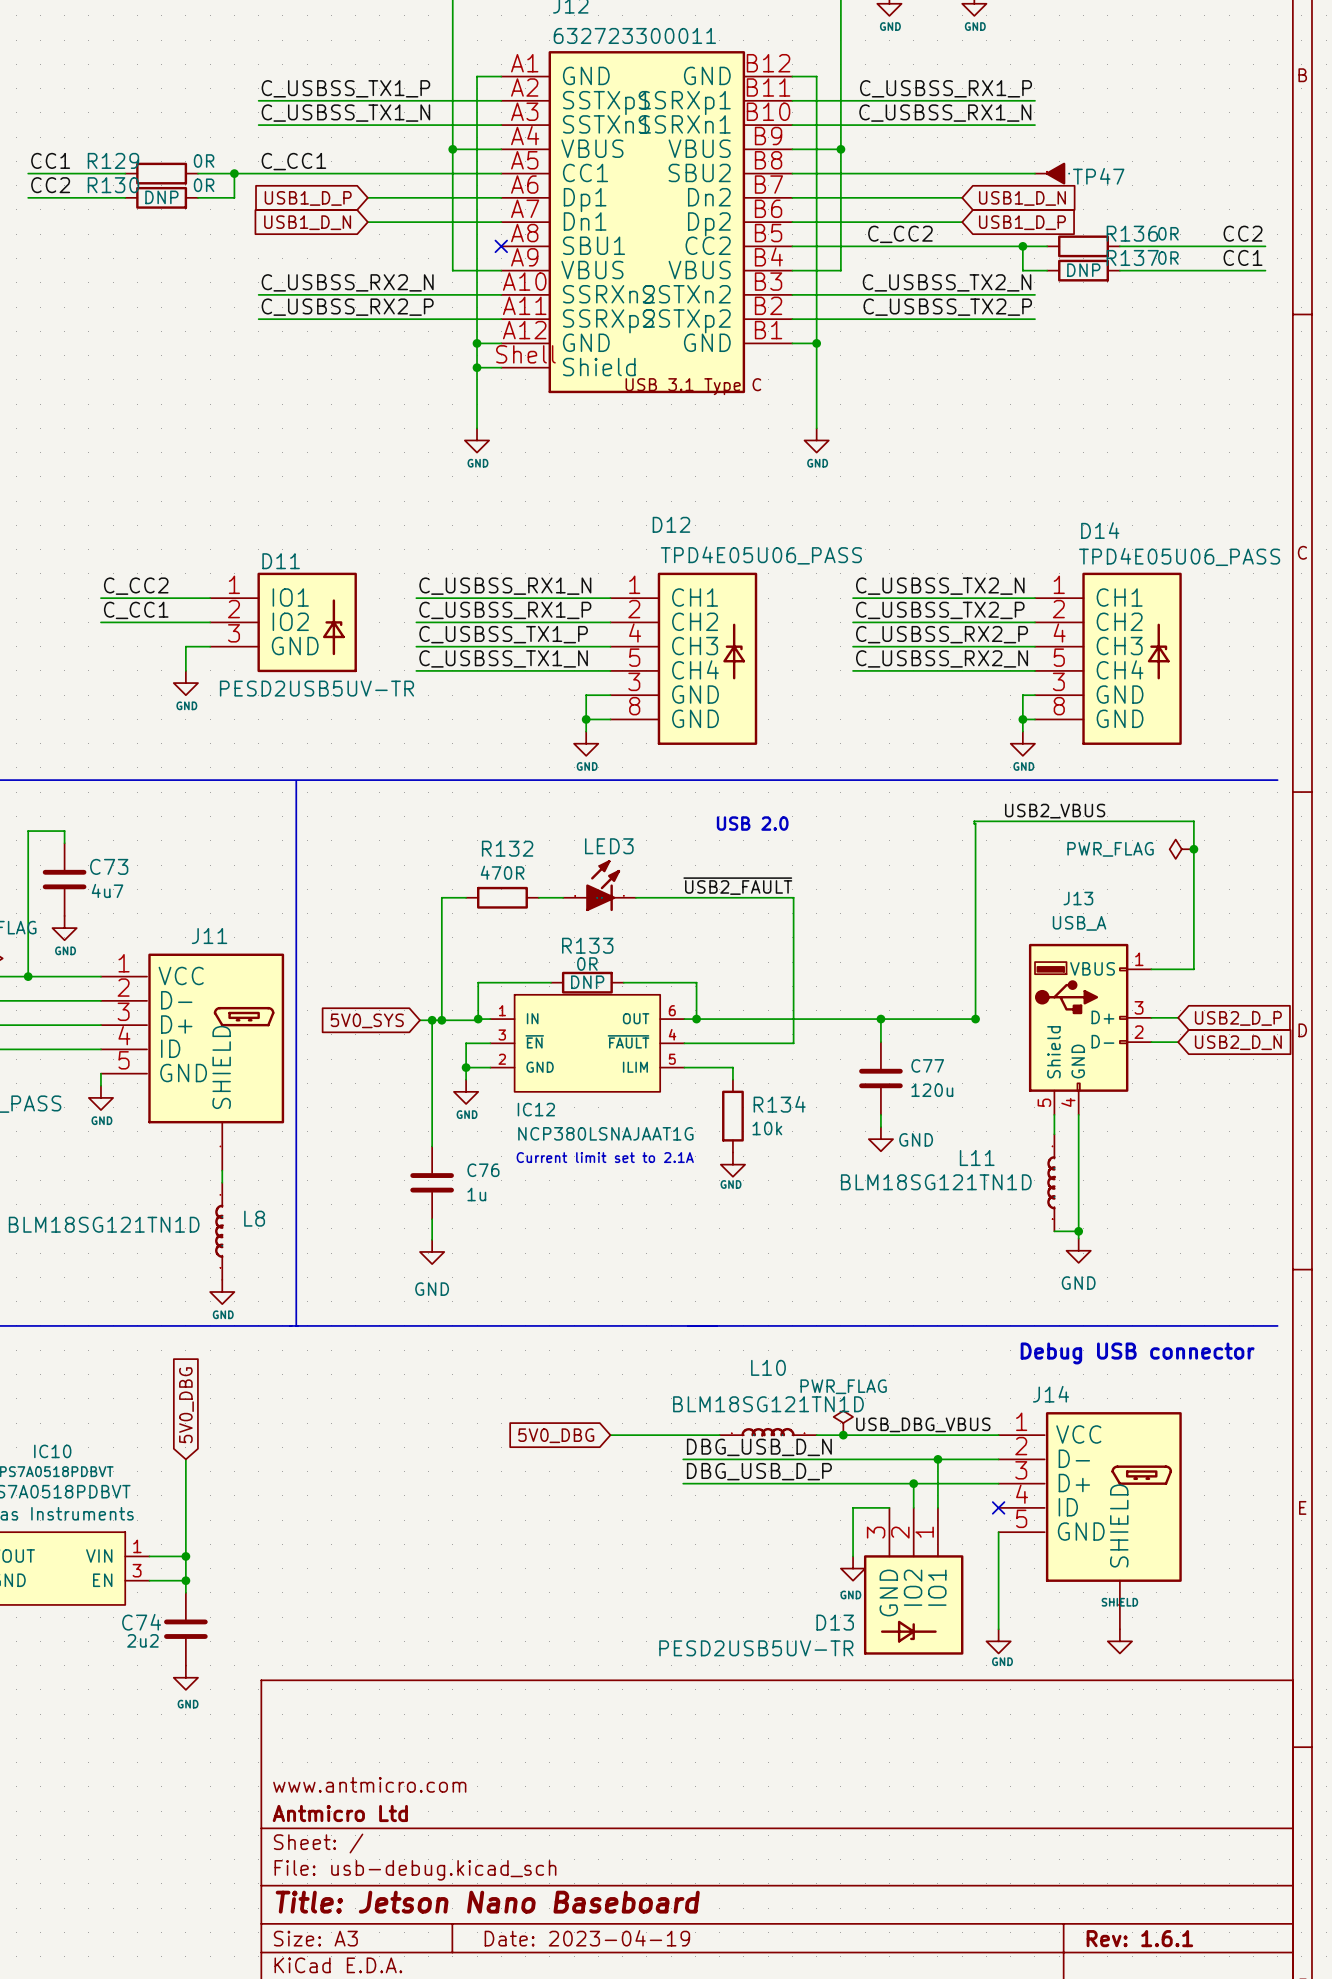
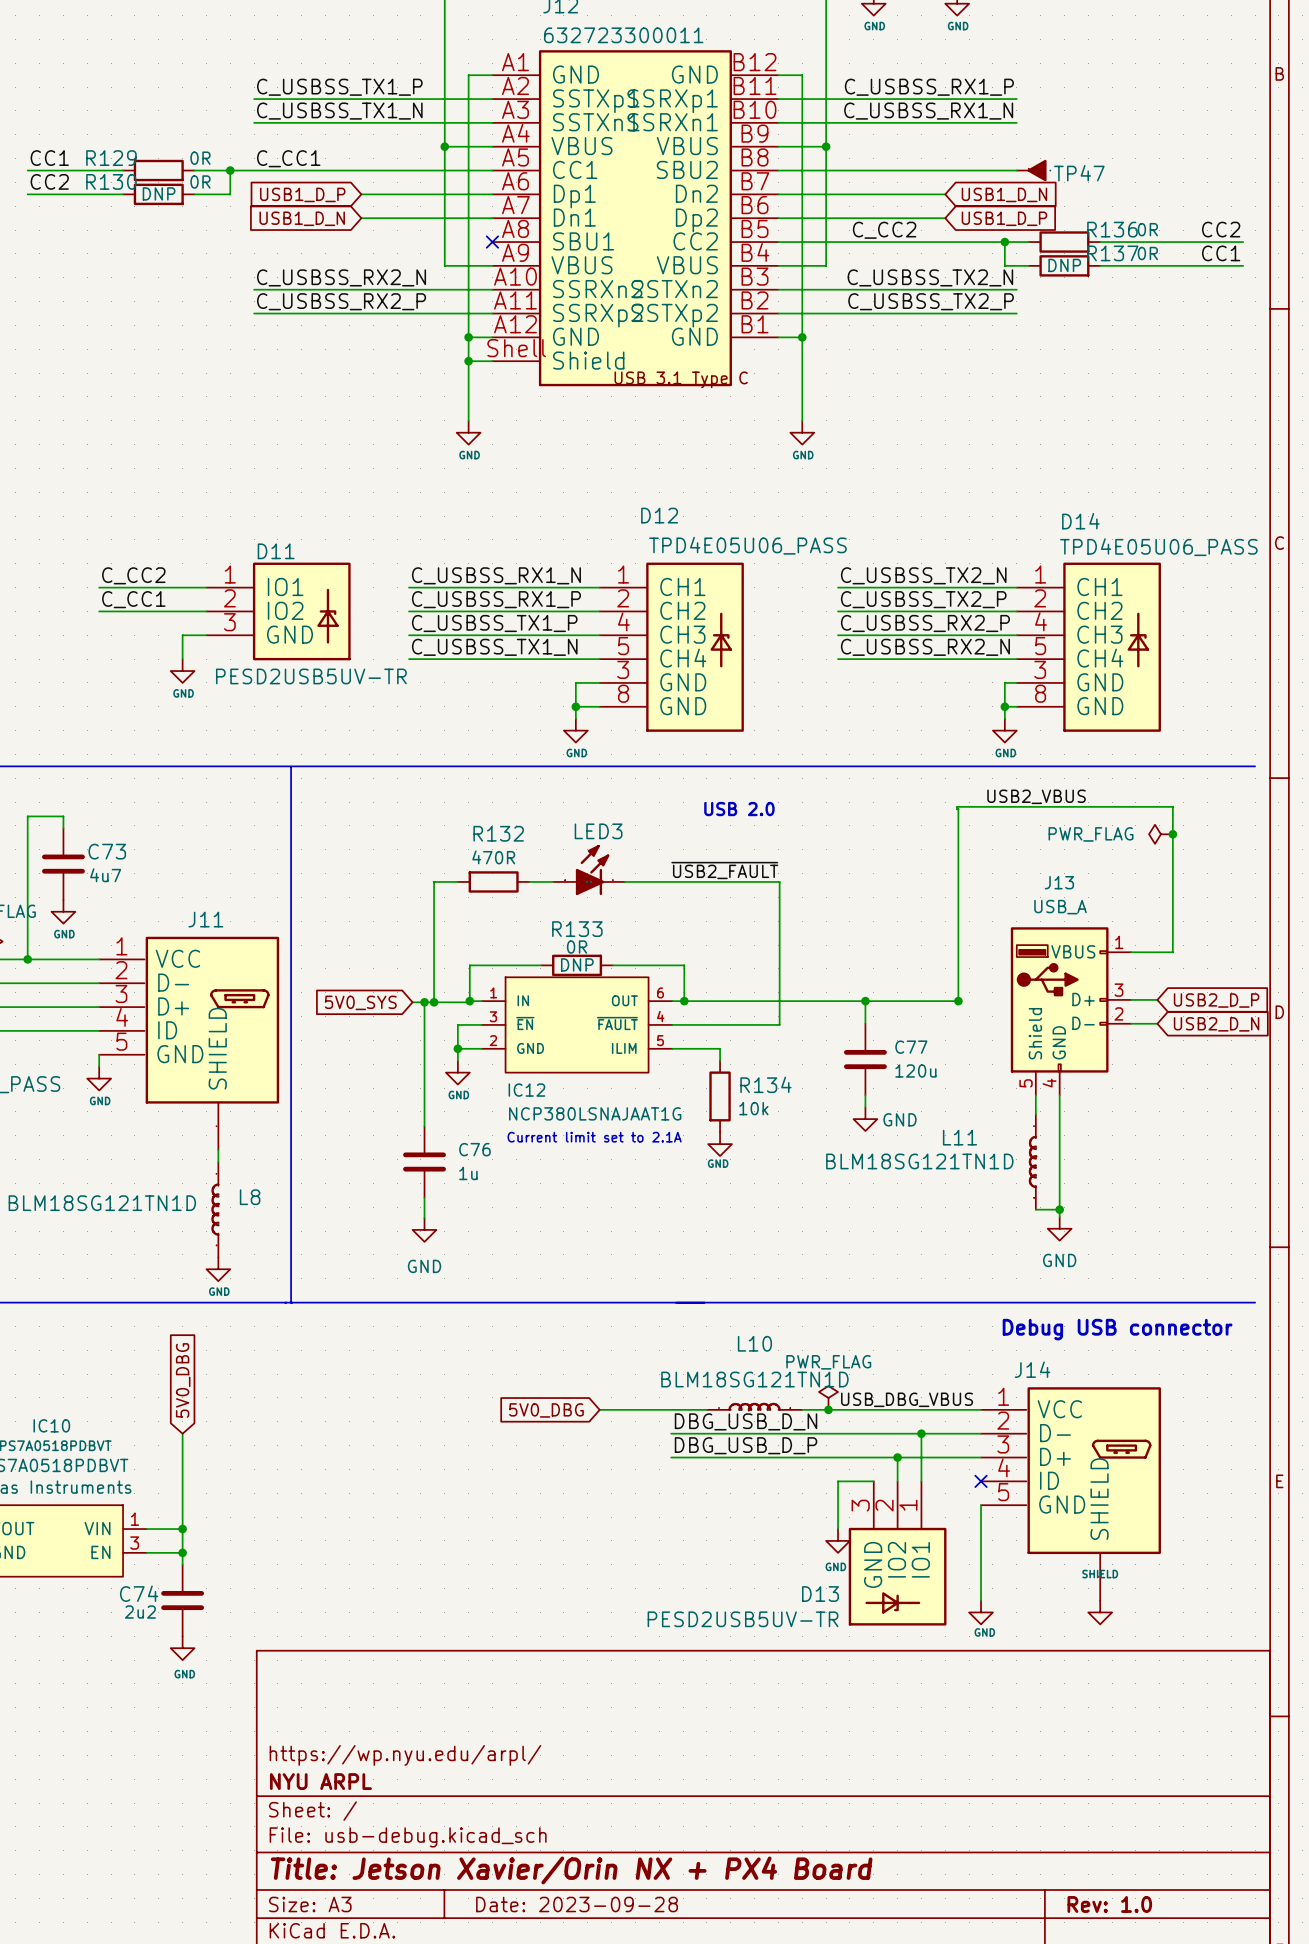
title block: www.antmicro.com (369, 1784) -> https://wp.nyu.edu/arpl/ (405, 1755)
title block: Antmicro Ltd (340, 1813) -> NYU ARPL (320, 1781)
title block: Title: Jetson Nano Baseboard (487, 1902) -> Title: Jetson Xavier/Orin NX + PX4 Board (571, 1870)
title block: Date: 2023-04-19 (587, 1938) -> Date: 2023-09-28 (577, 1904)
title block: Rev: 1.6.1 (1139, 1938) -> Rev: 1.0 (1109, 1904)

